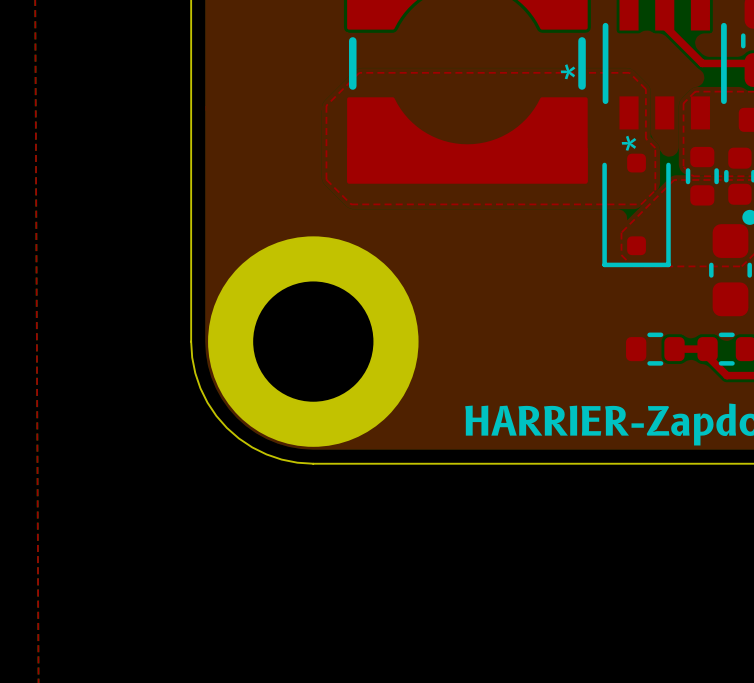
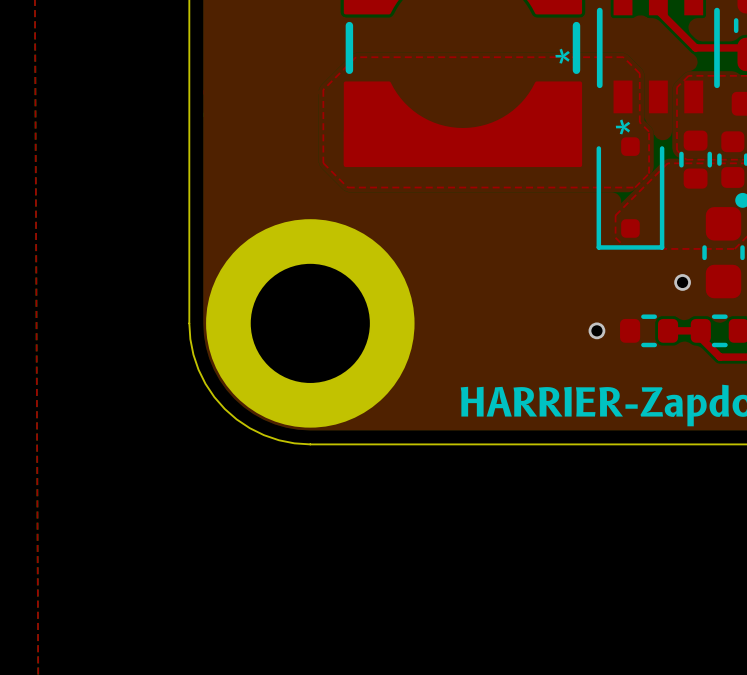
via: none -> (682, 282)
via: none -> (596, 330)

